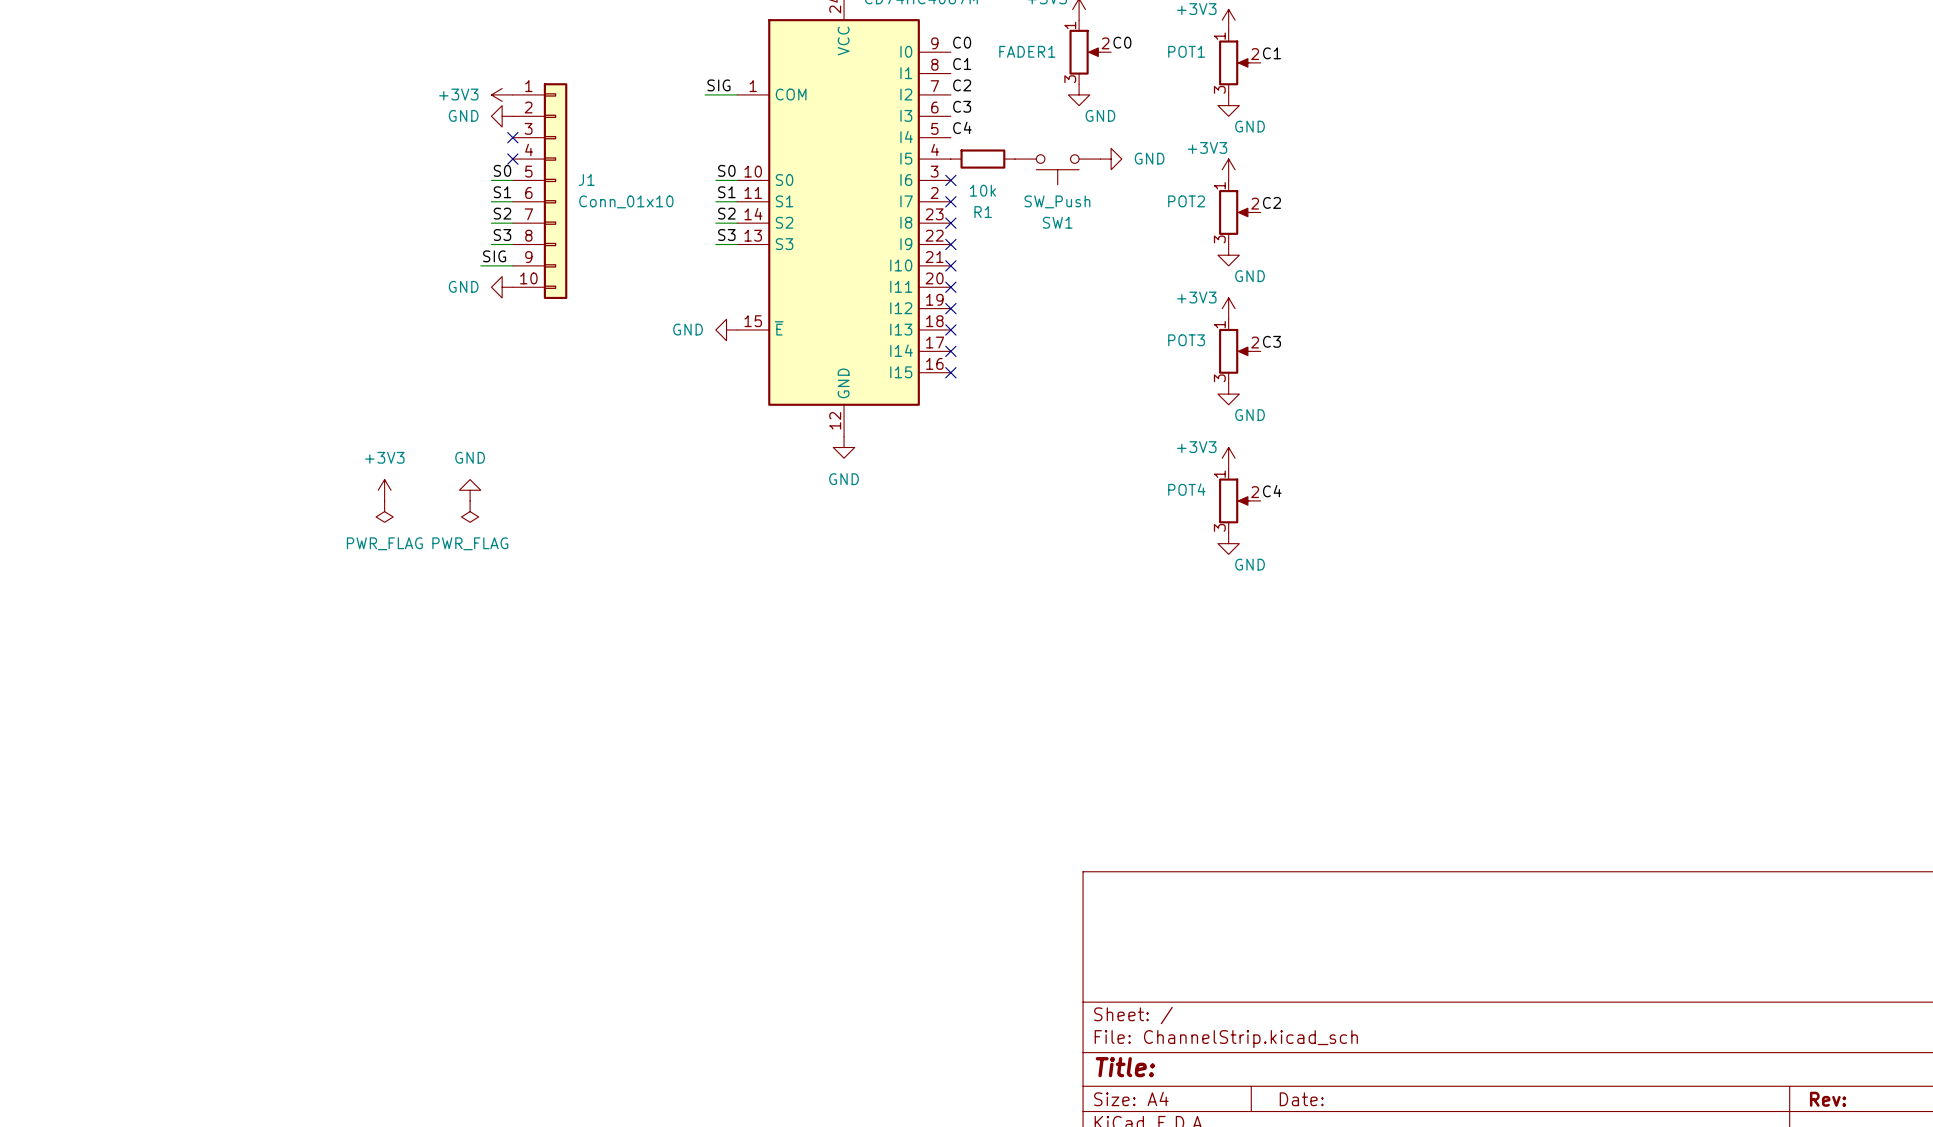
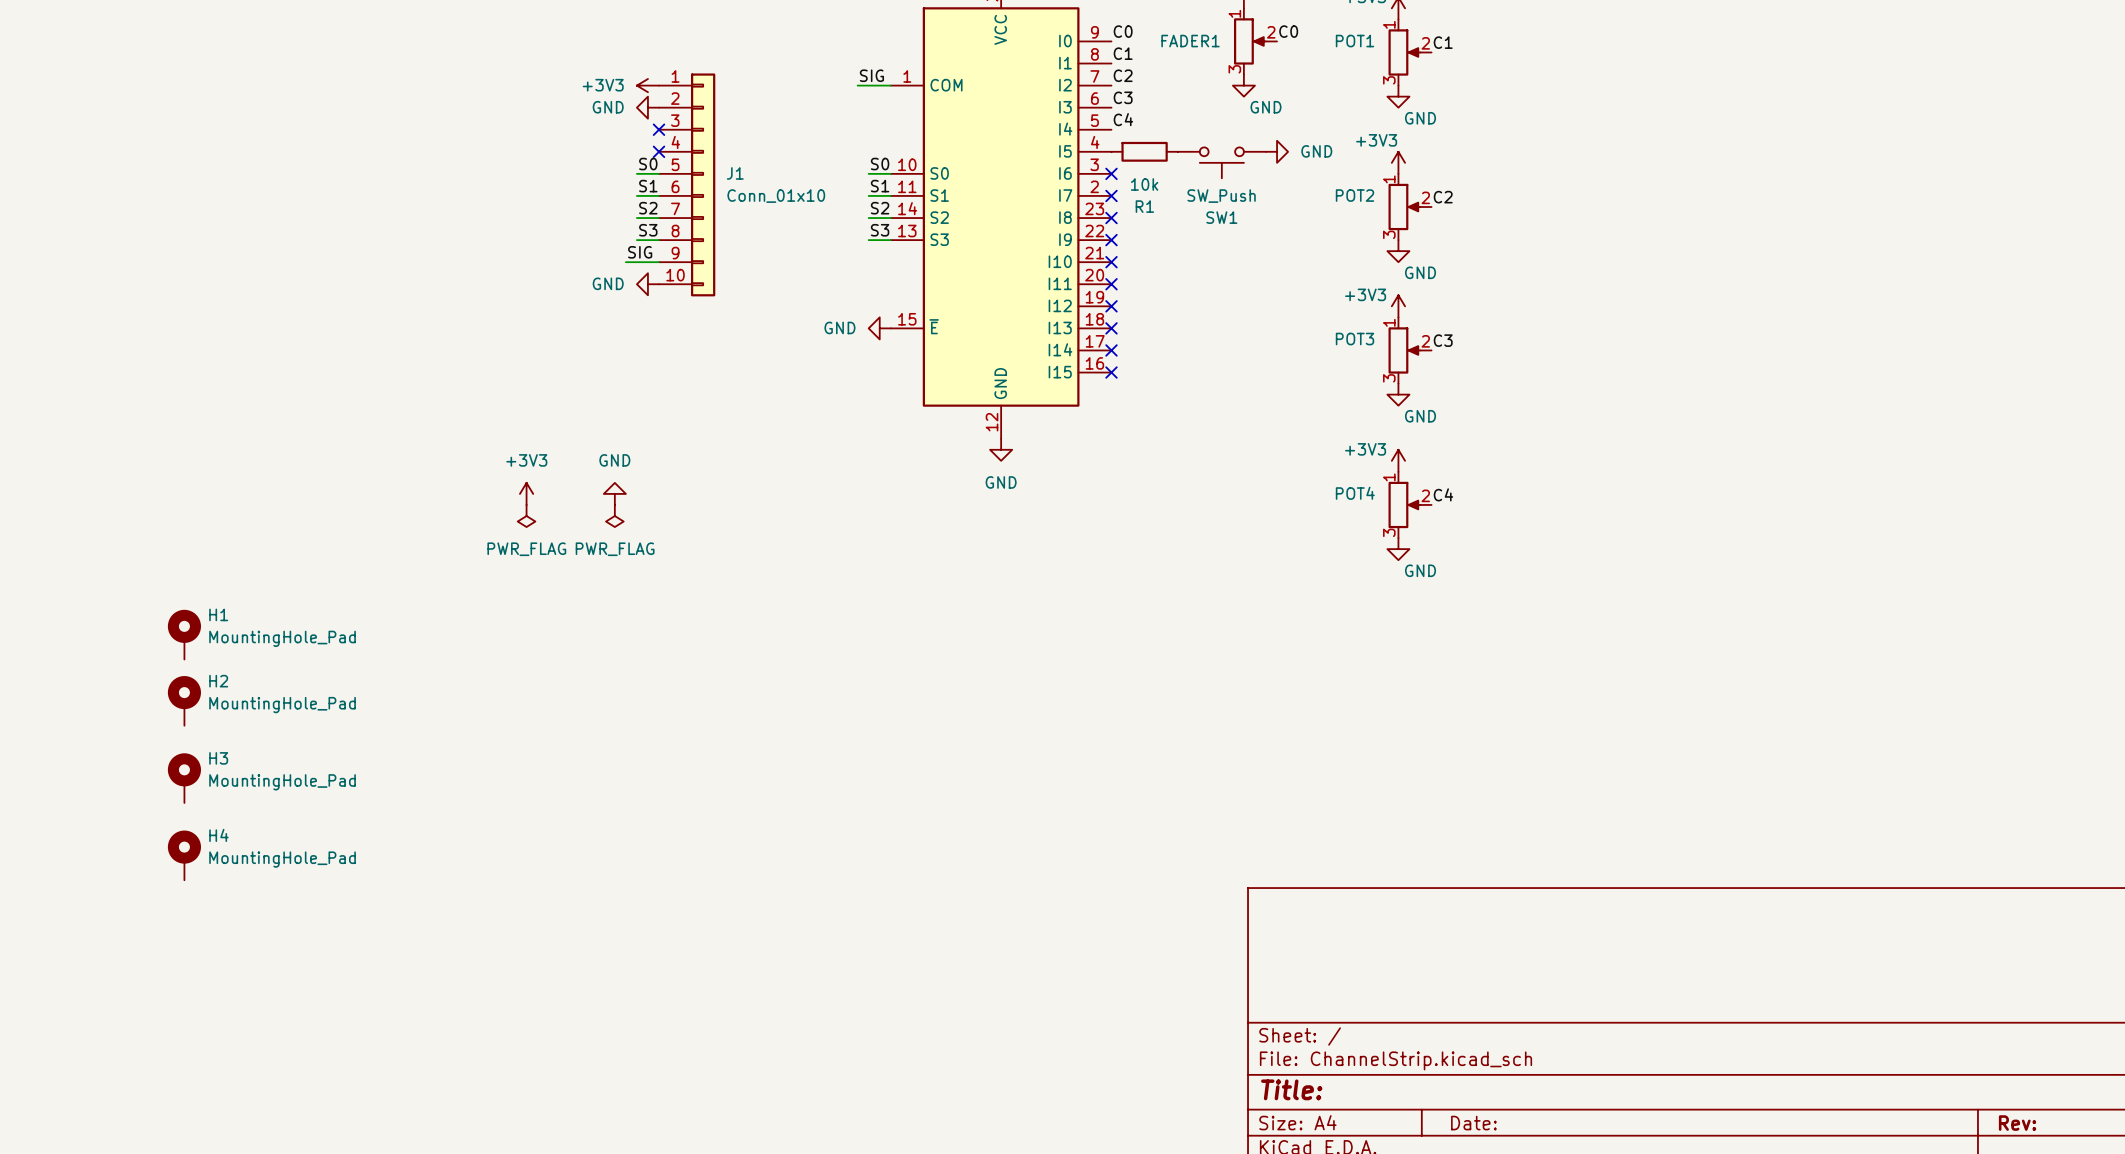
H1: none -> MountingHole_Pad (184, 634)
H2: none -> MountingHole_Pad (184, 700)
H3: none -> MountingHole_Pad (184, 778)
H4: none -> MountingHole_Pad (184, 855)

